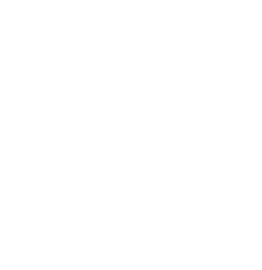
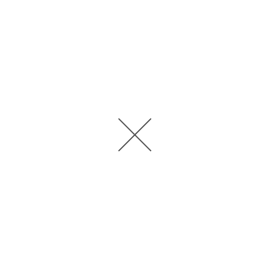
no-connect mark: none -> (134, 134)

